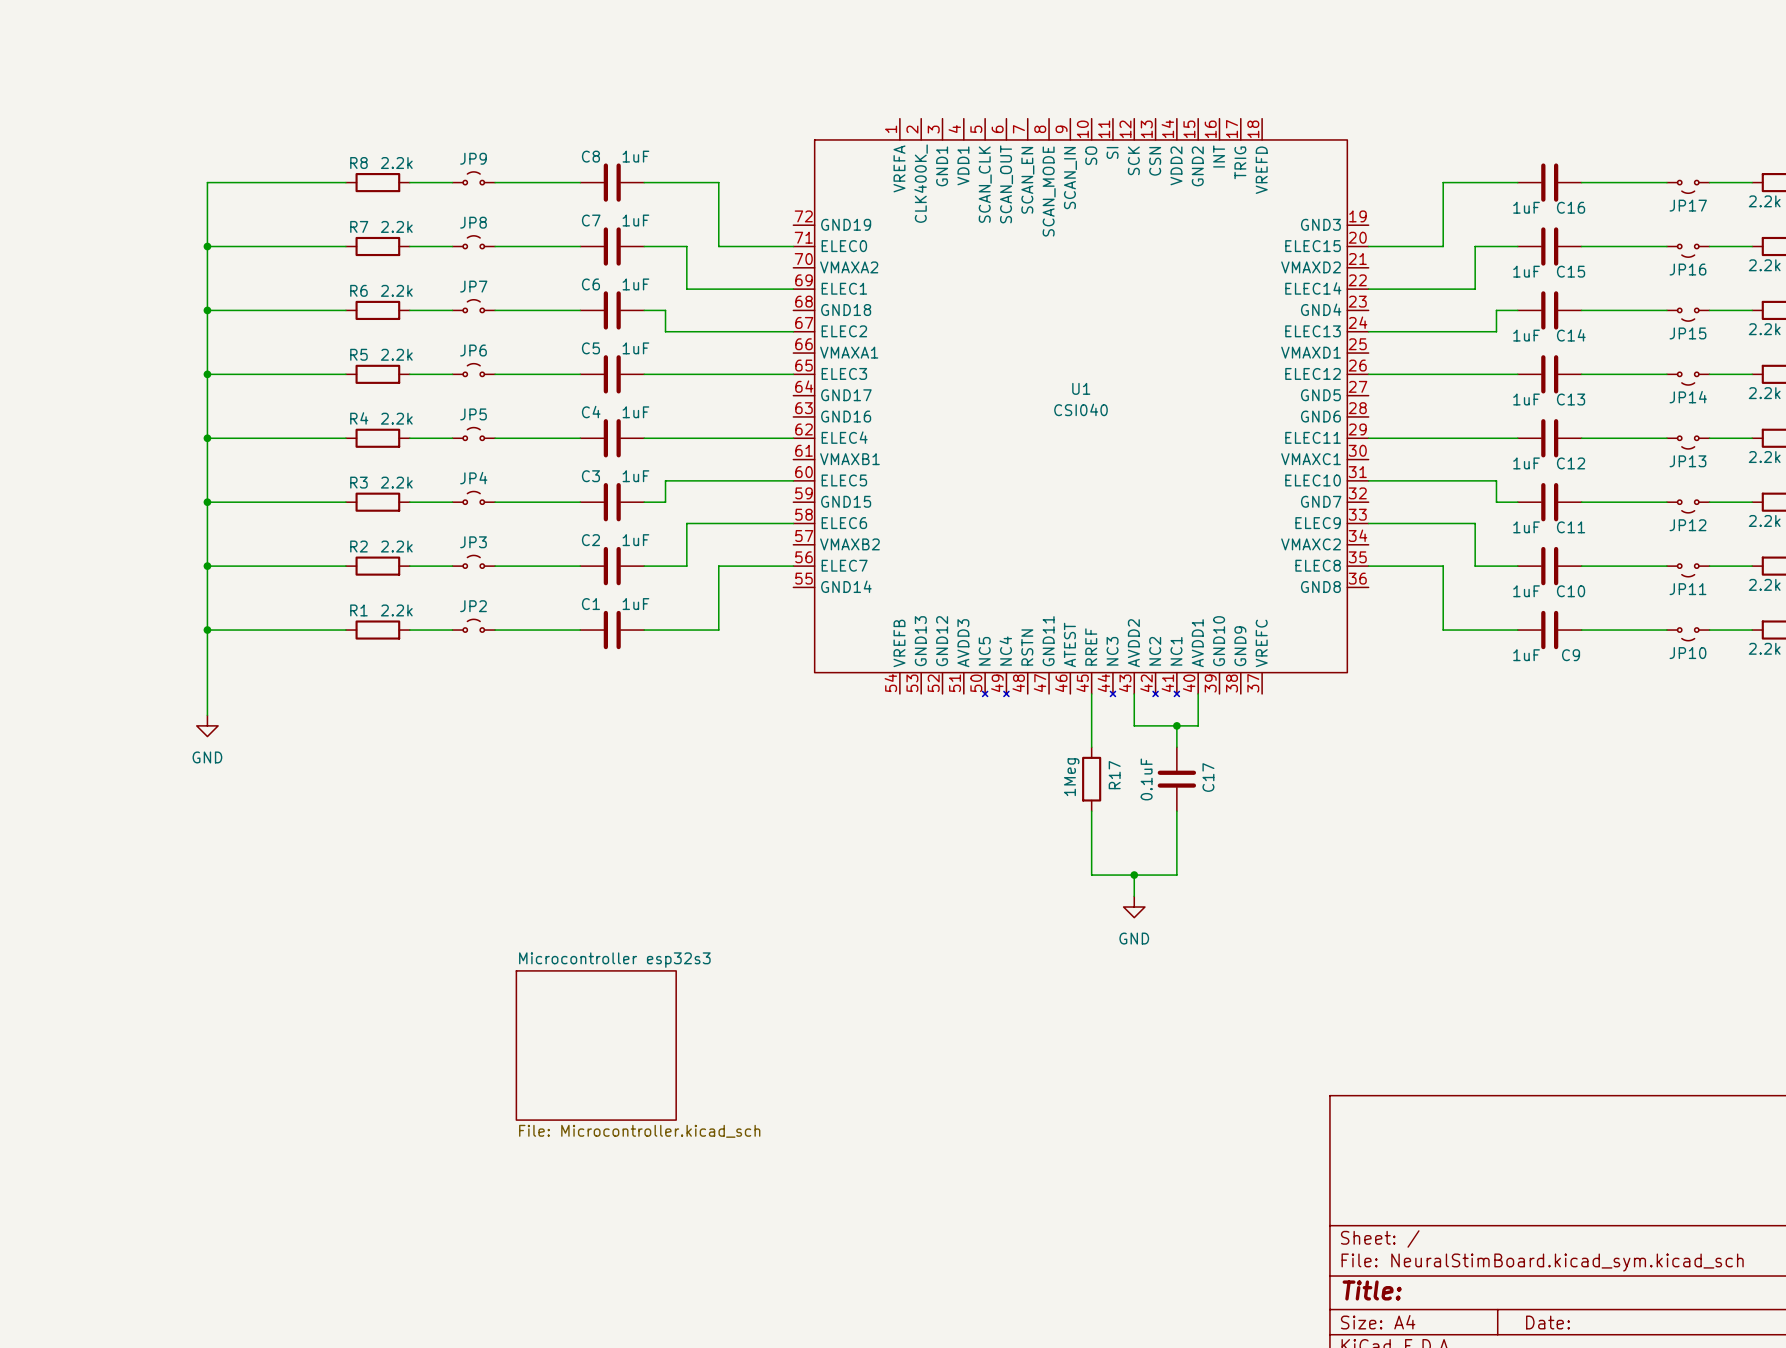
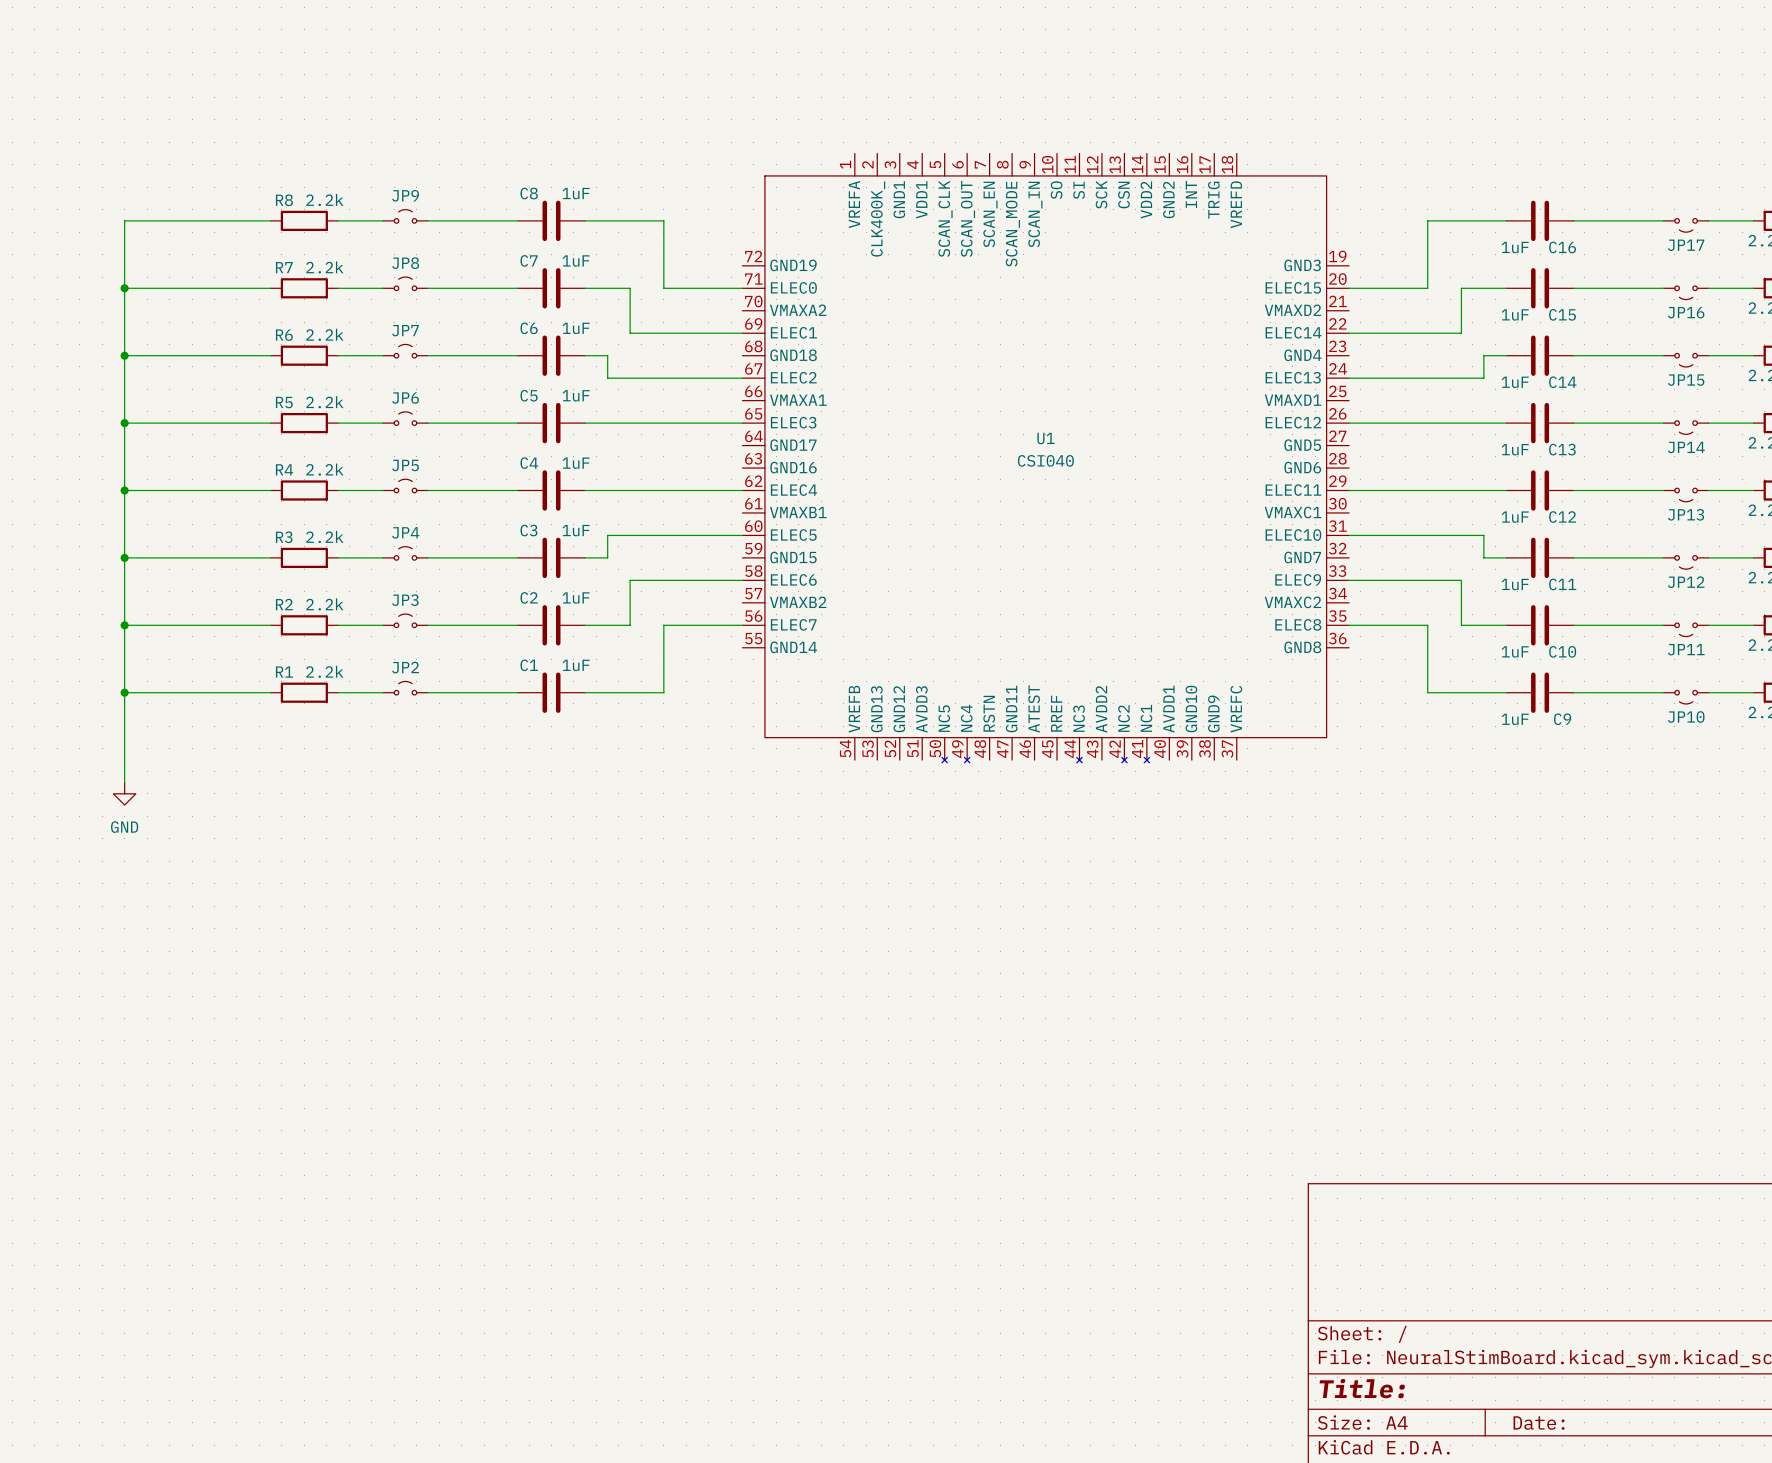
wire: (1091, 693) (1091, 747) -> none
wire: (1134, 693) (1134, 725) (1198, 725) (1198, 693) -> none
wire: (1176, 725) (1176, 747) -> none
junction: (1176, 725) -> none
R17: 1Meg (1091, 779) -> none
C17: 0.1uF (1176, 779) -> none
wire: (1091, 811) (1091, 875) (1176, 875) (1176, 811) -> none
wire: (1134, 875) (1134, 896) -> none
junction: (1134, 875) -> none
power symbol: GND (1134, 907) -> none
sheet Microcontroller esp32s3: File: Microcontroller.kicad_sch (596, 1045) -> none

